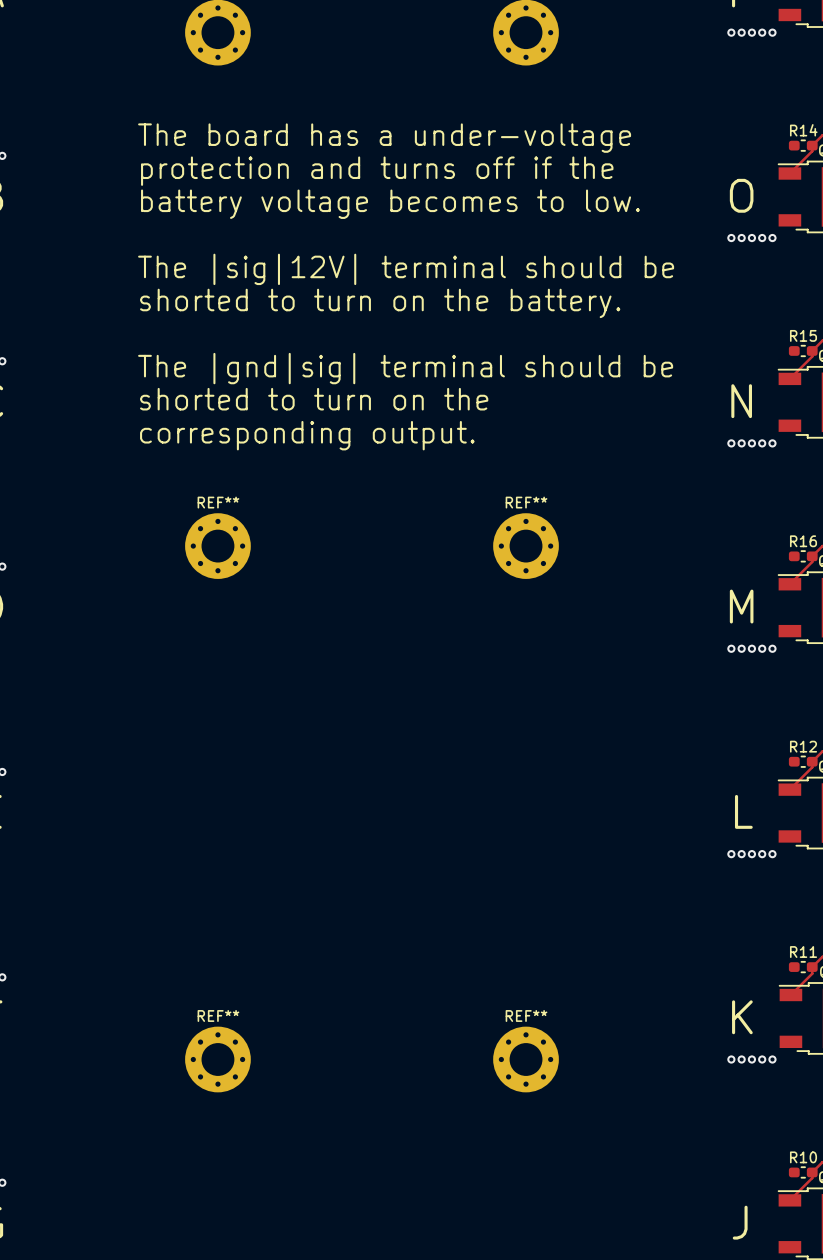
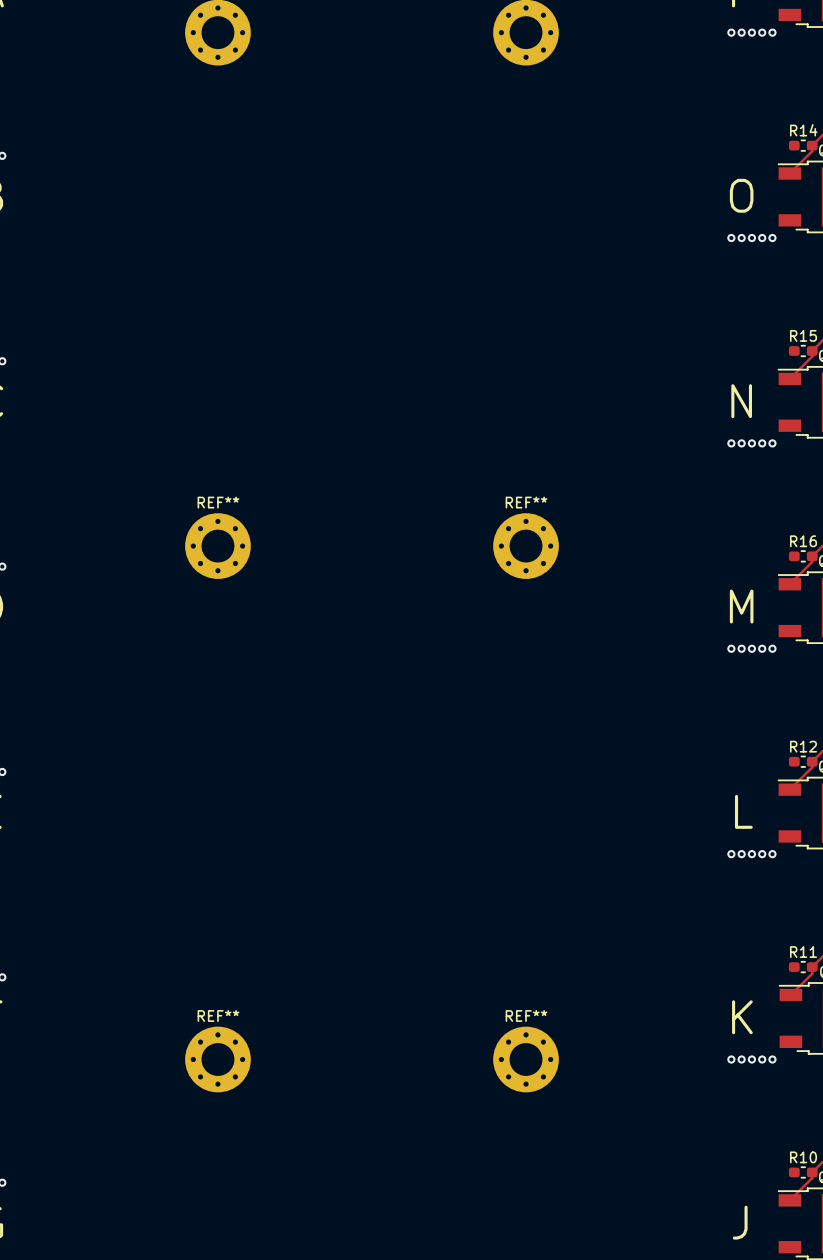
text: The board has a under-voltage (384, 138) -> none
text: protection and turns off if the (377, 171) -> none
text: battery voltage becomes to low. (390, 204) -> none
text: The |sig|12V| terminal should be (406, 269) -> none
text: shorted to turn on the battery. (380, 303) -> none
text: The |gnd|sig| terminal should be (405, 368) -> none
text: shorted to turn on the (314, 399) -> none
text: corresponding output. (307, 435) -> none

